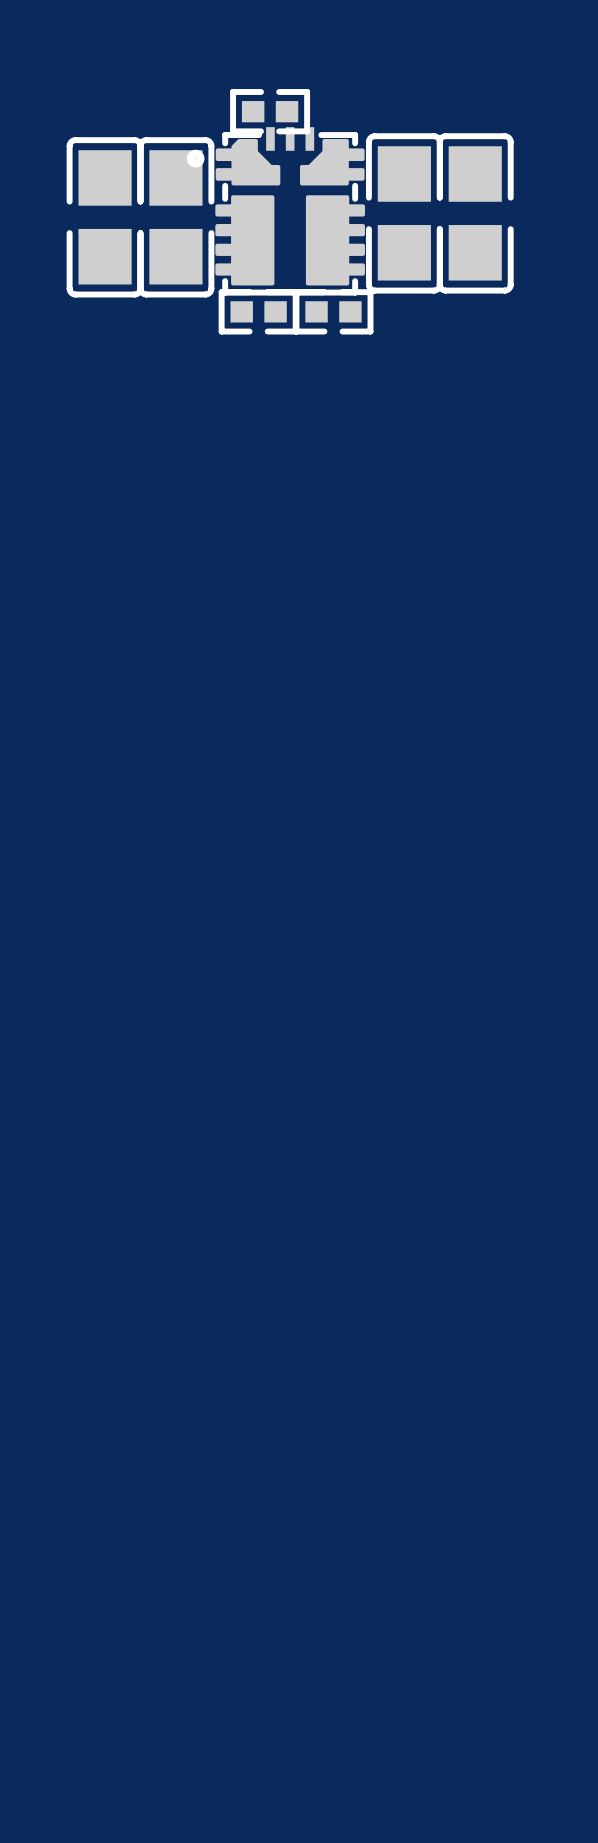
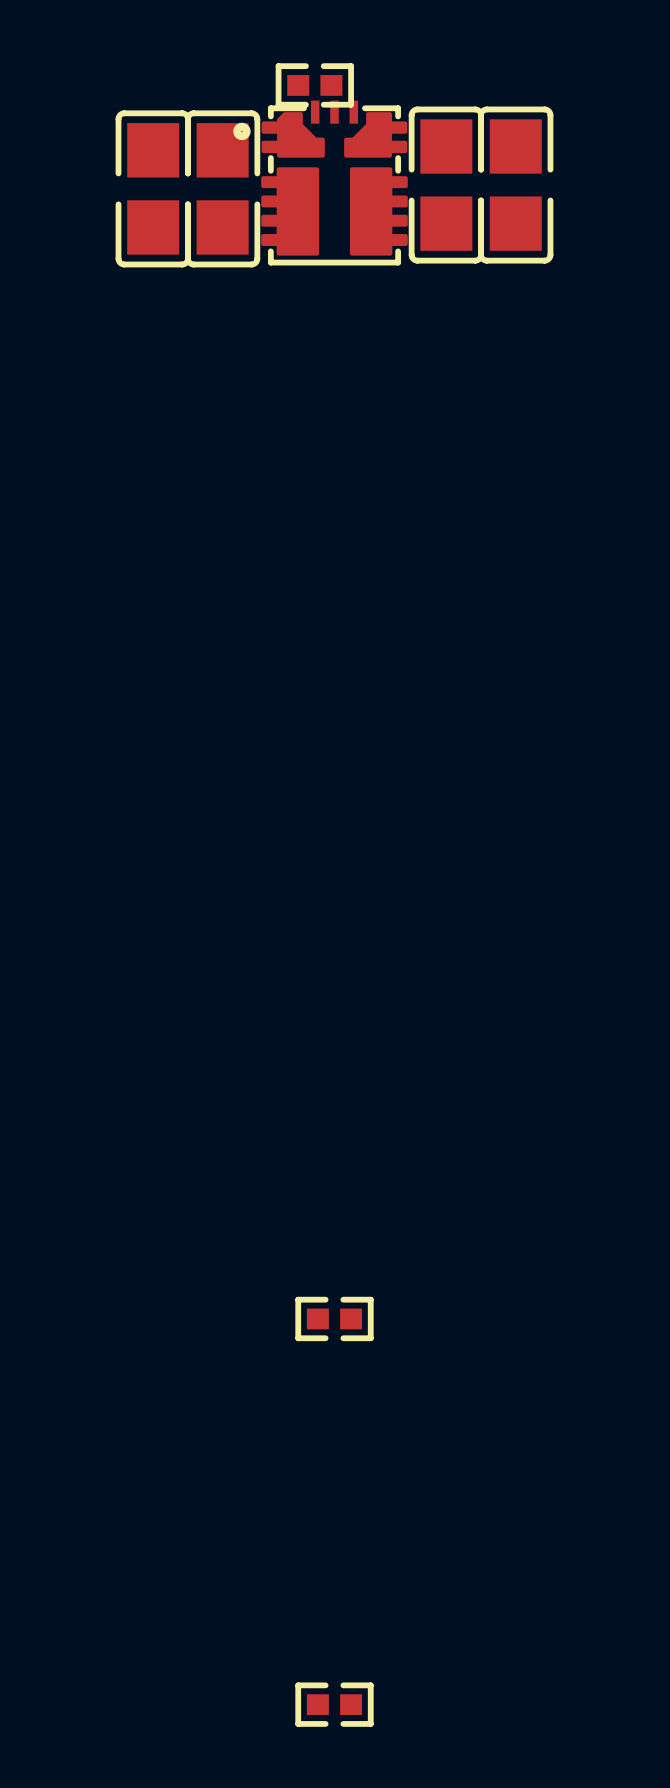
part: (258, 311) -> none
part: (333, 311) -> none
part: none -> (334, 1318)
part: none -> (334, 1704)

